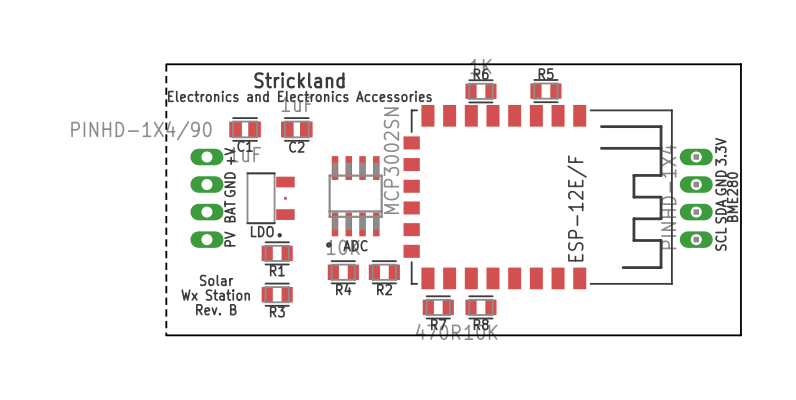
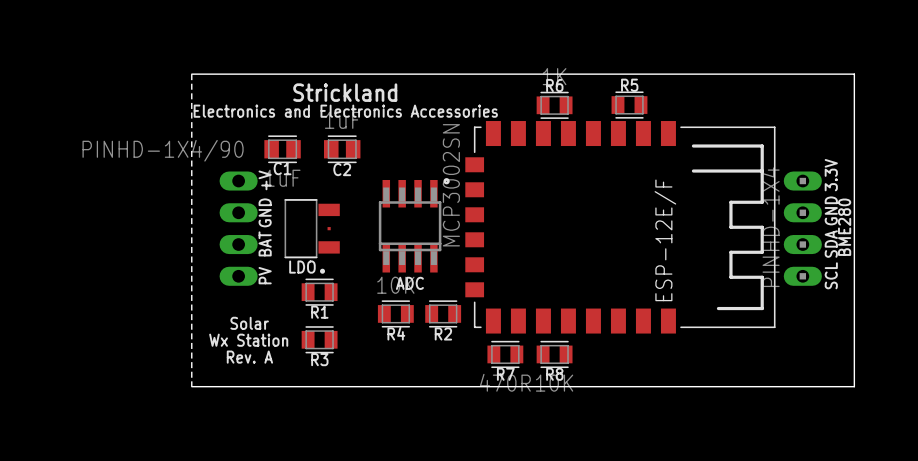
drawing position: (328, 244) -> (446, 181)
text: Rev. B (216, 309) -> Rev. A (249, 357)

